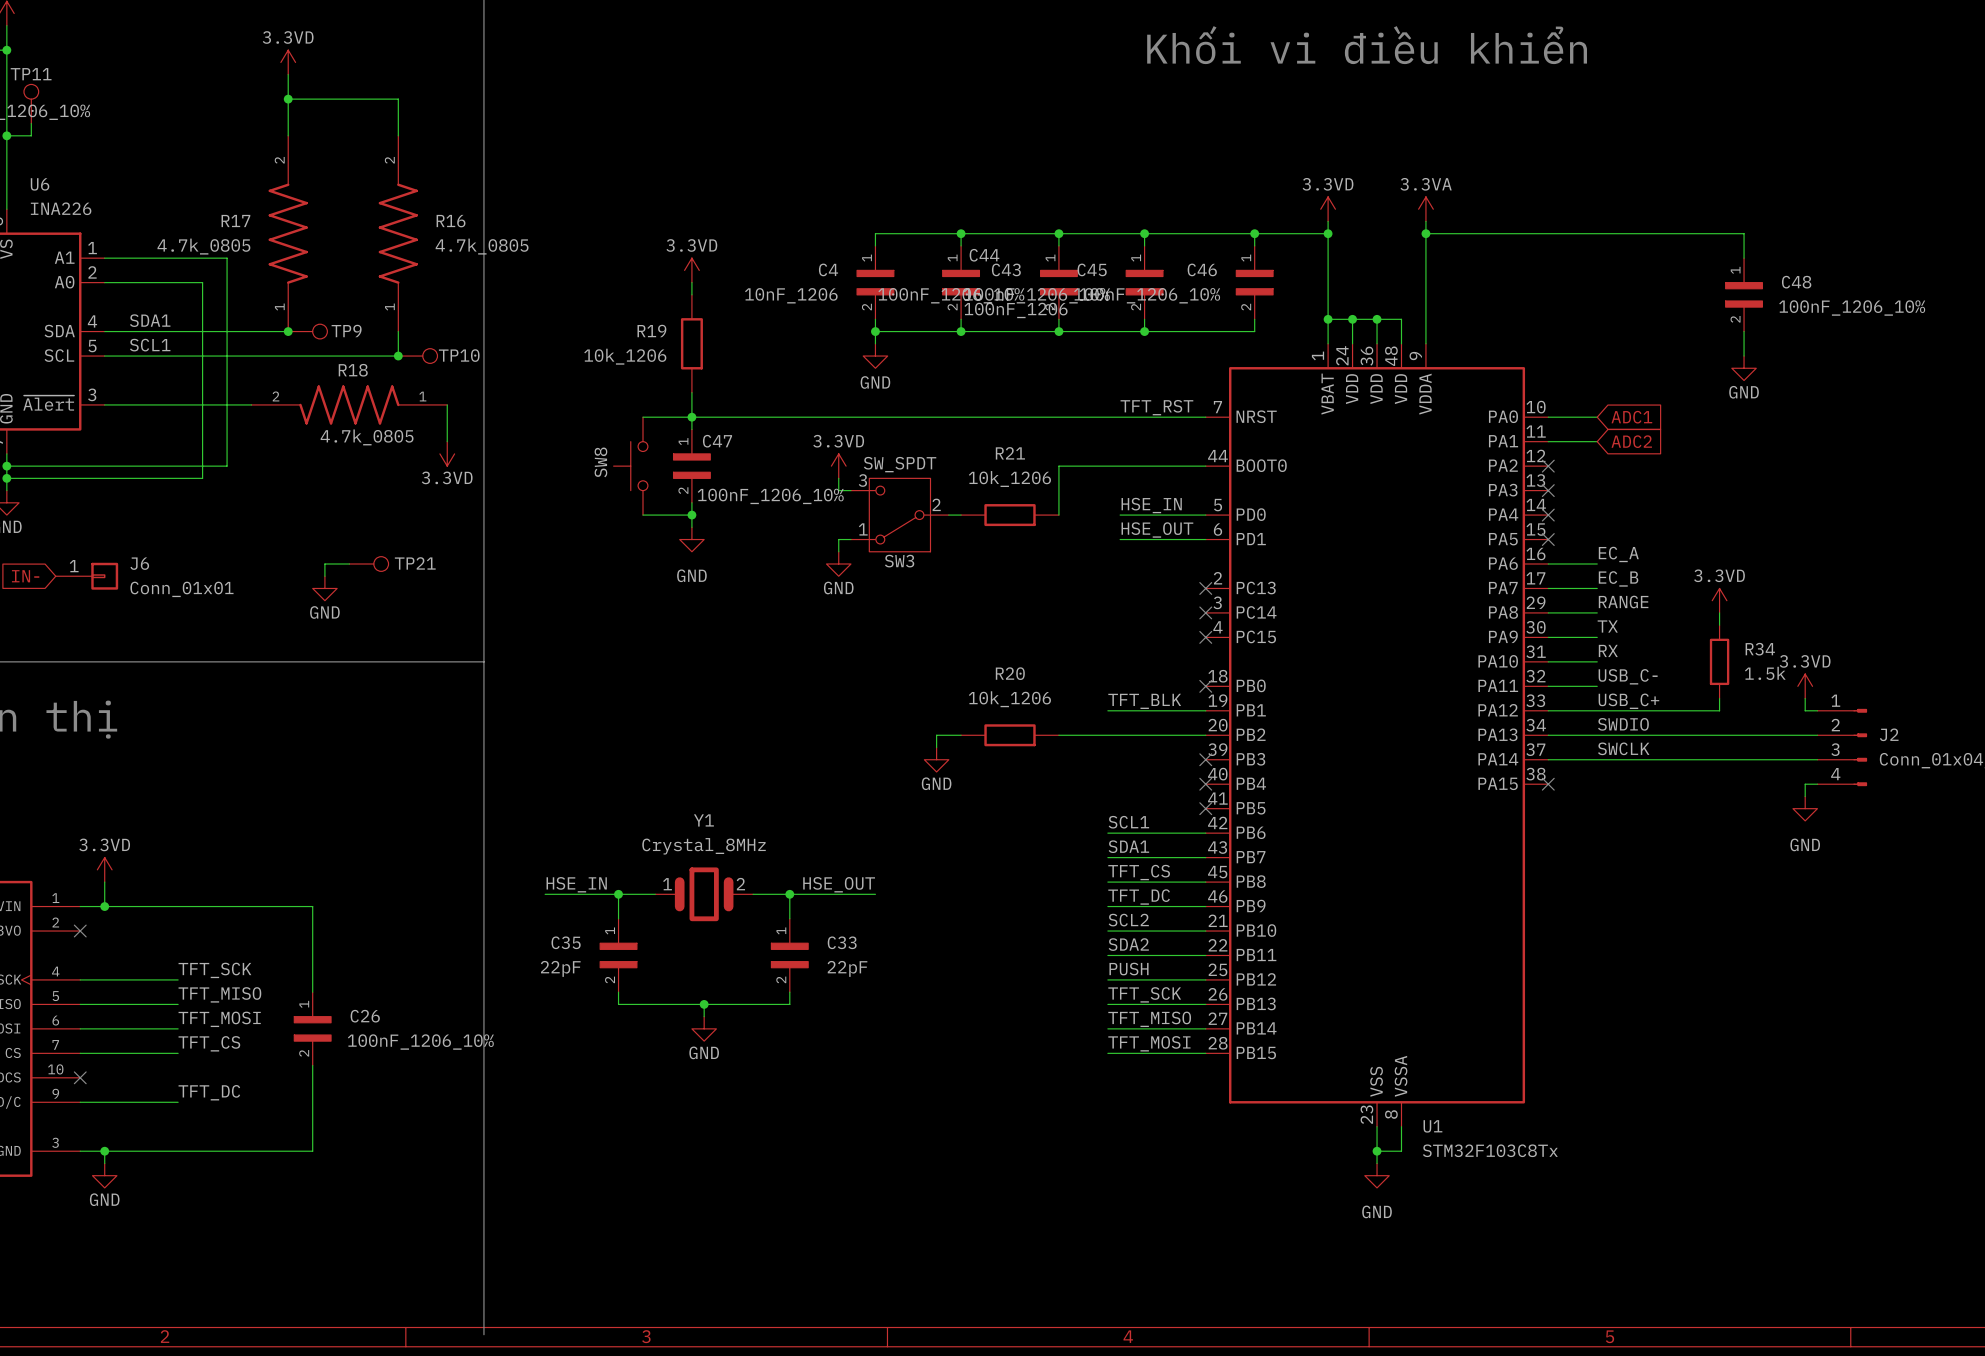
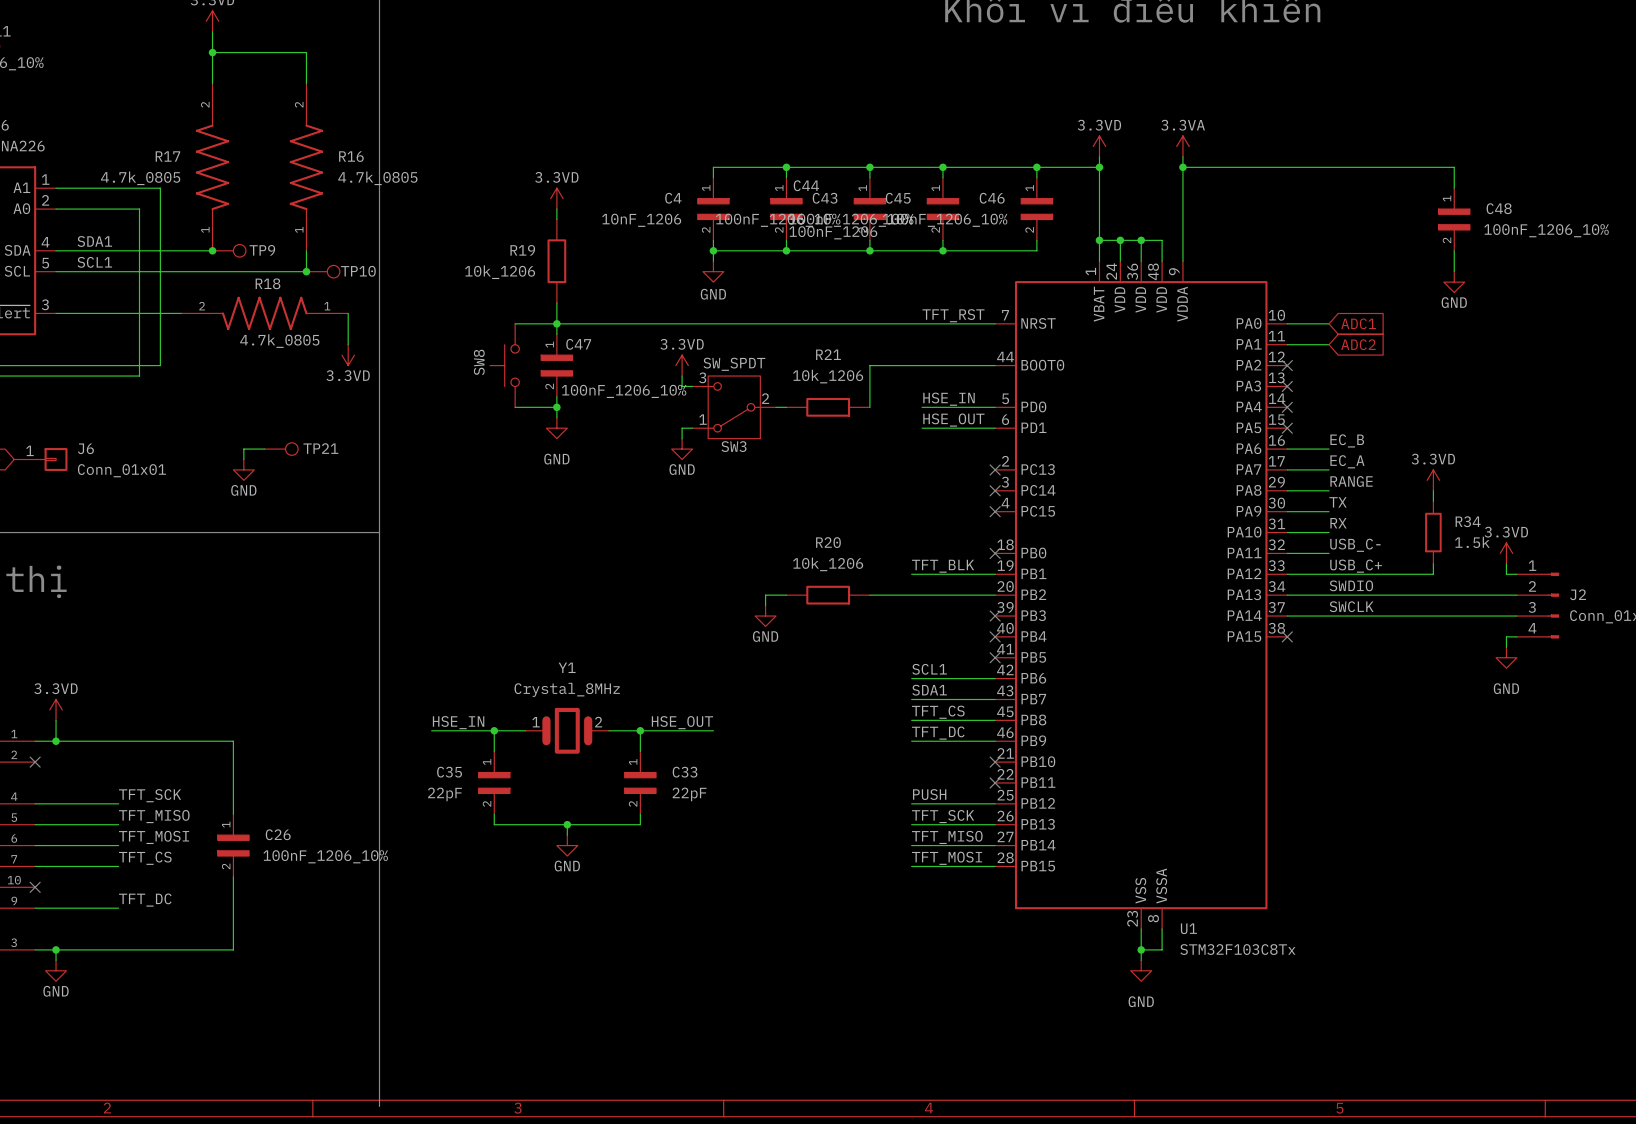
label: EC_A (1618, 554) -> EC_B (1347, 440)
label: EC_B (1618, 578) -> EC_A (1347, 461)
label: SCL2 (1128, 920) -> none
wire: (1107, 931) (1205, 931) -> none
no-connect mark: none -> (995, 762)
label: SDA2 (1128, 944) -> none
wire: (1107, 955) (1205, 955) -> none
no-connect mark: none -> (995, 782)

